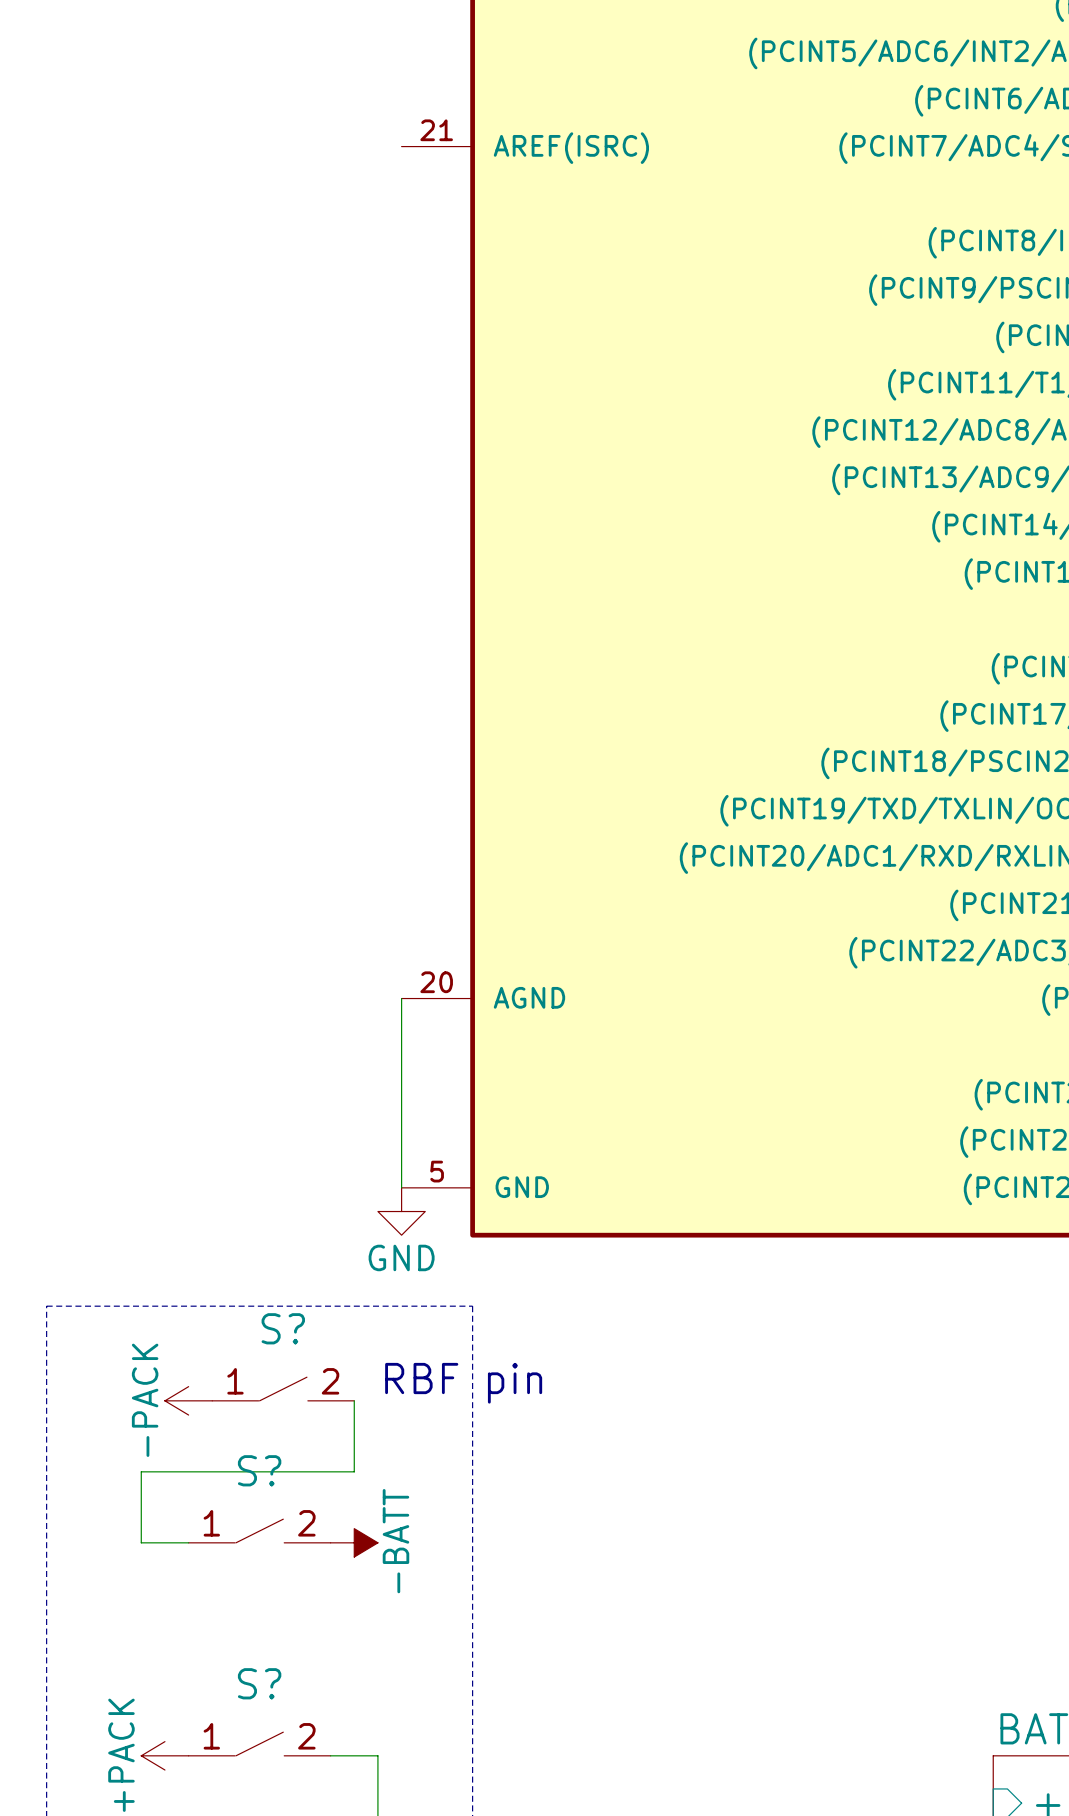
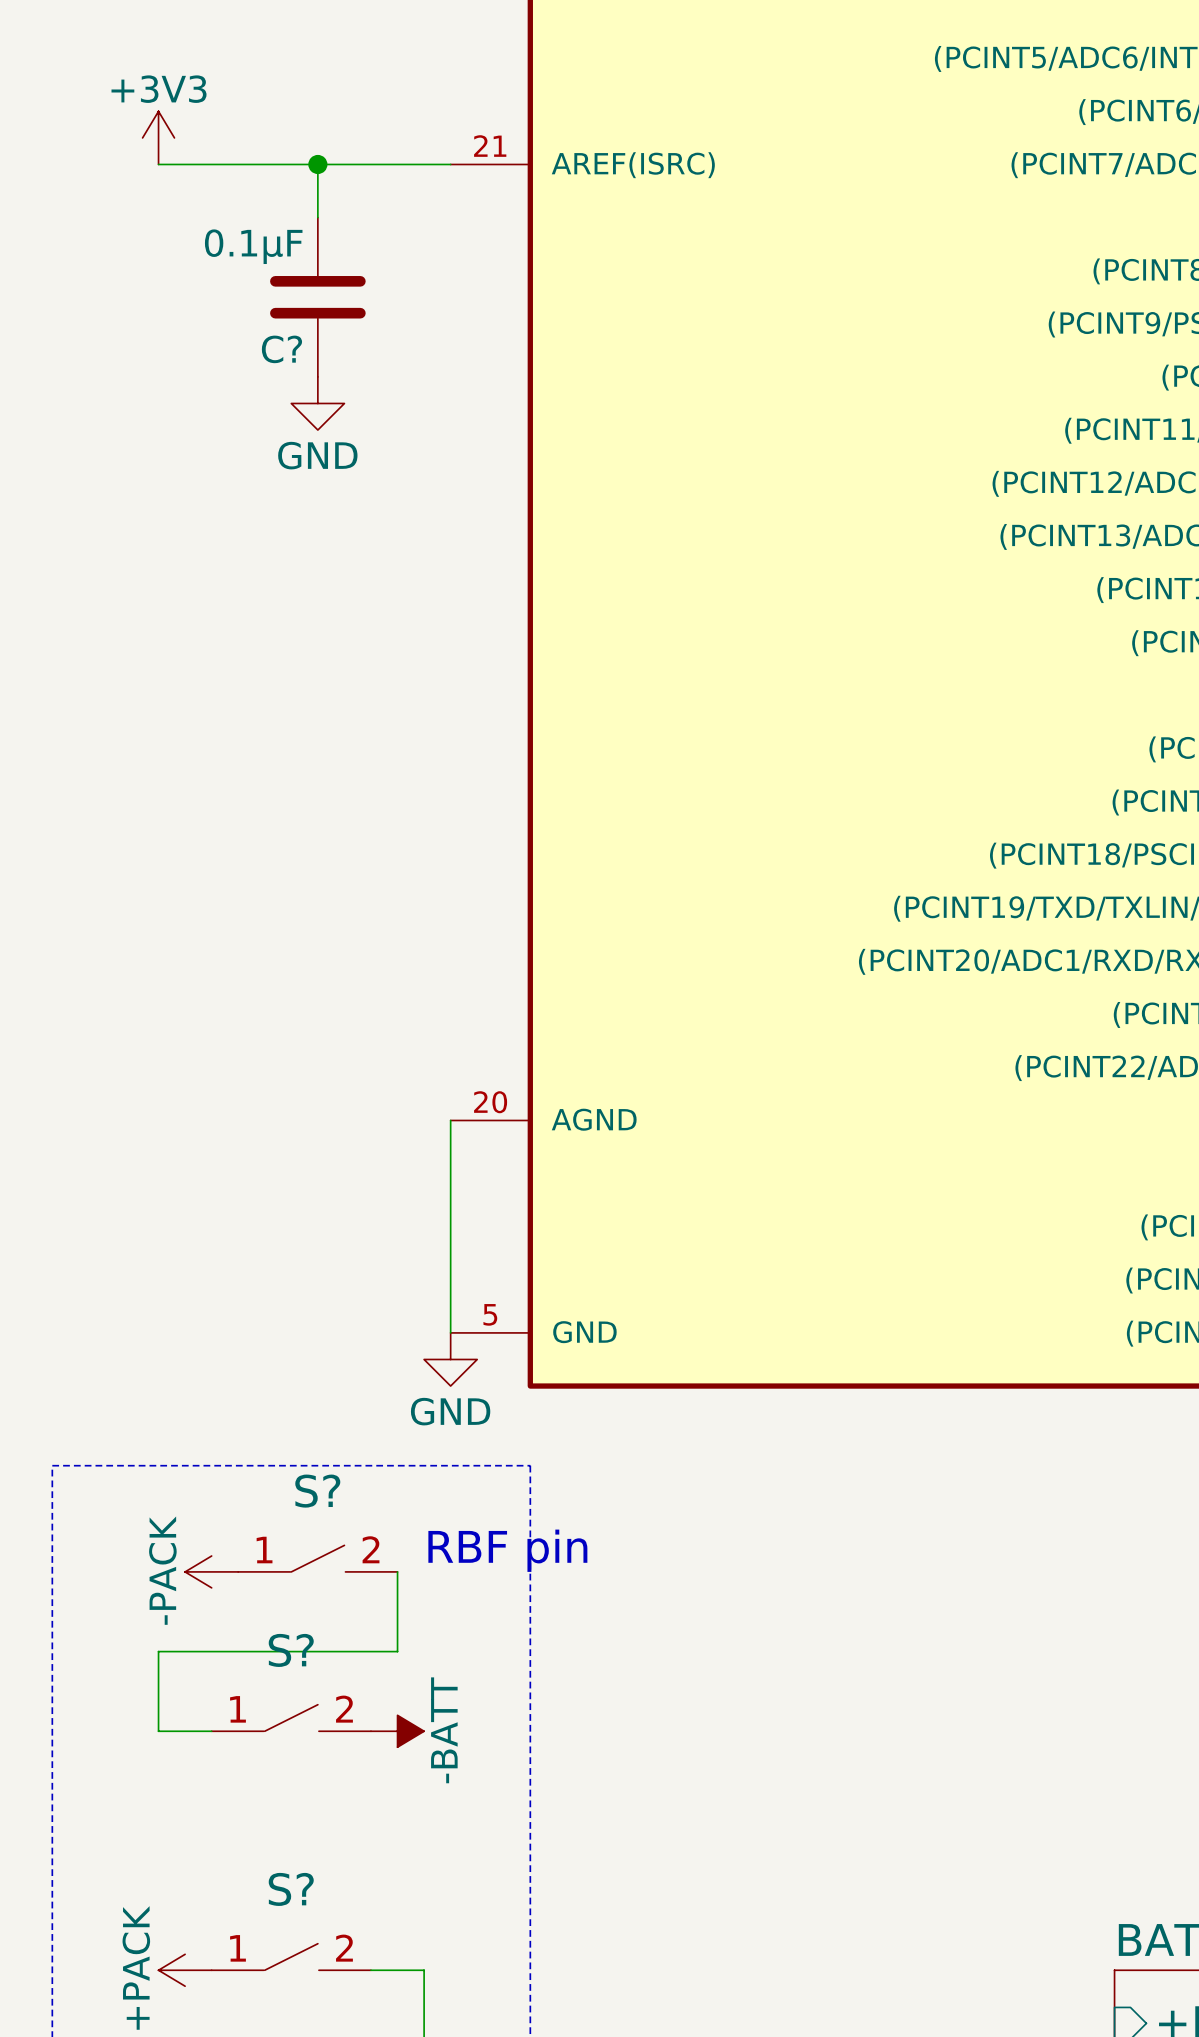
power symbol: none -> +3V3 (158, 137)
wire: none -> (158, 164) (450, 164)
wire: none -> (317, 164) (317, 217)
junction: none -> (317, 164)
C?: none -> 0.1µF (317, 297)
power symbol: none -> GND (317, 403)

